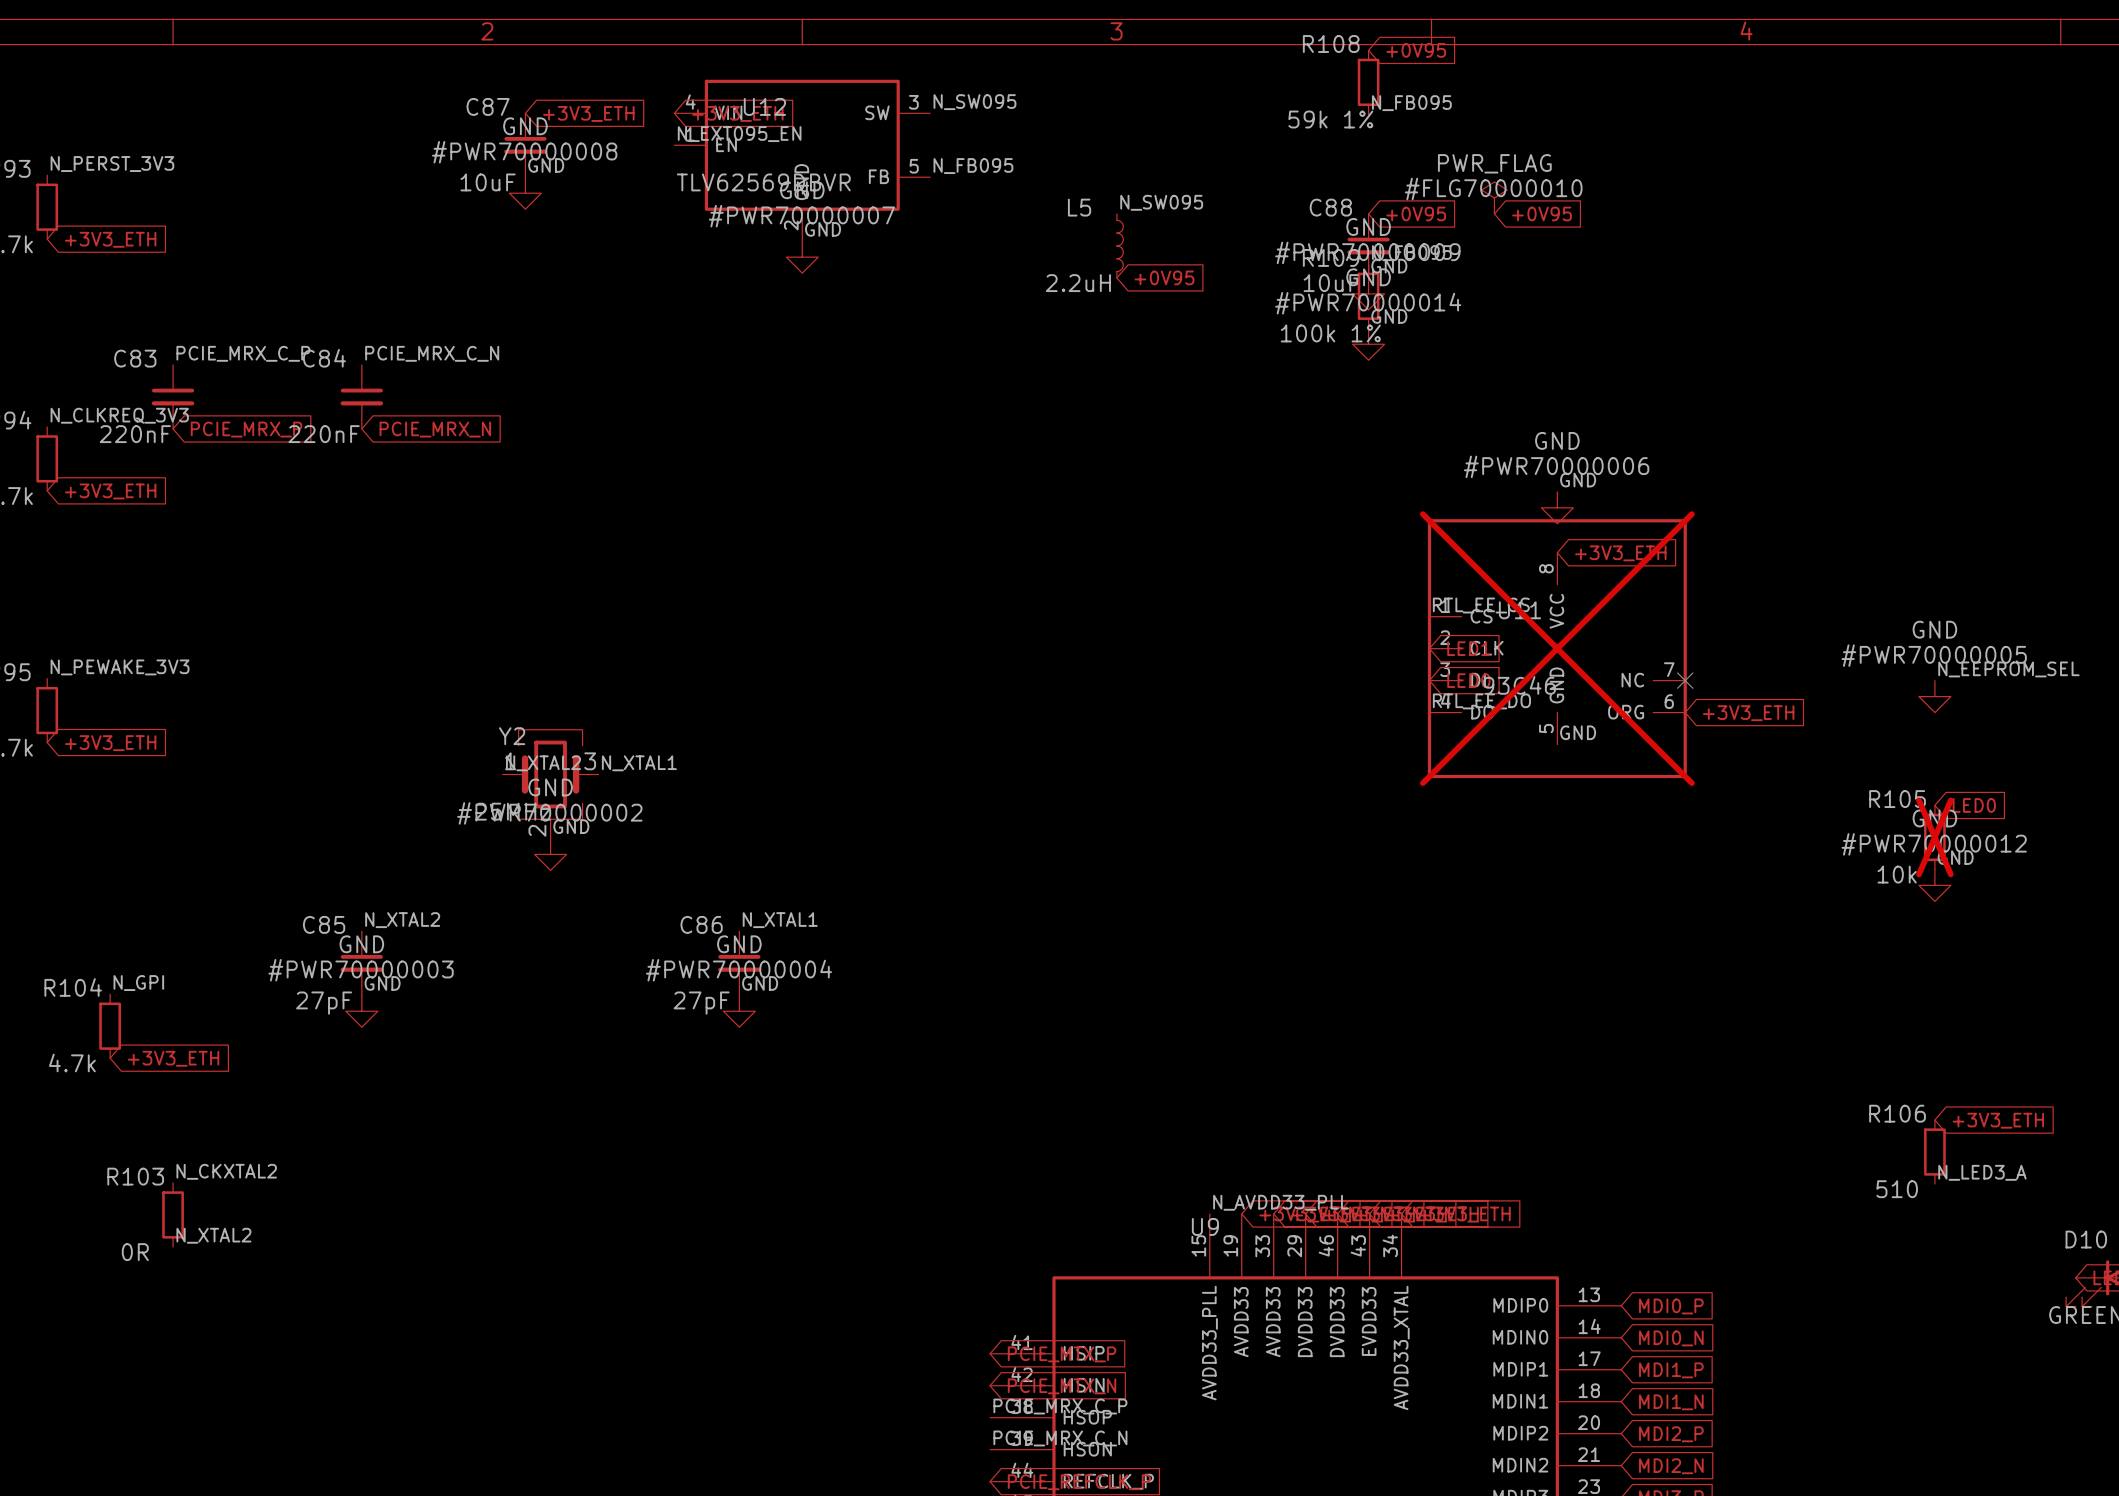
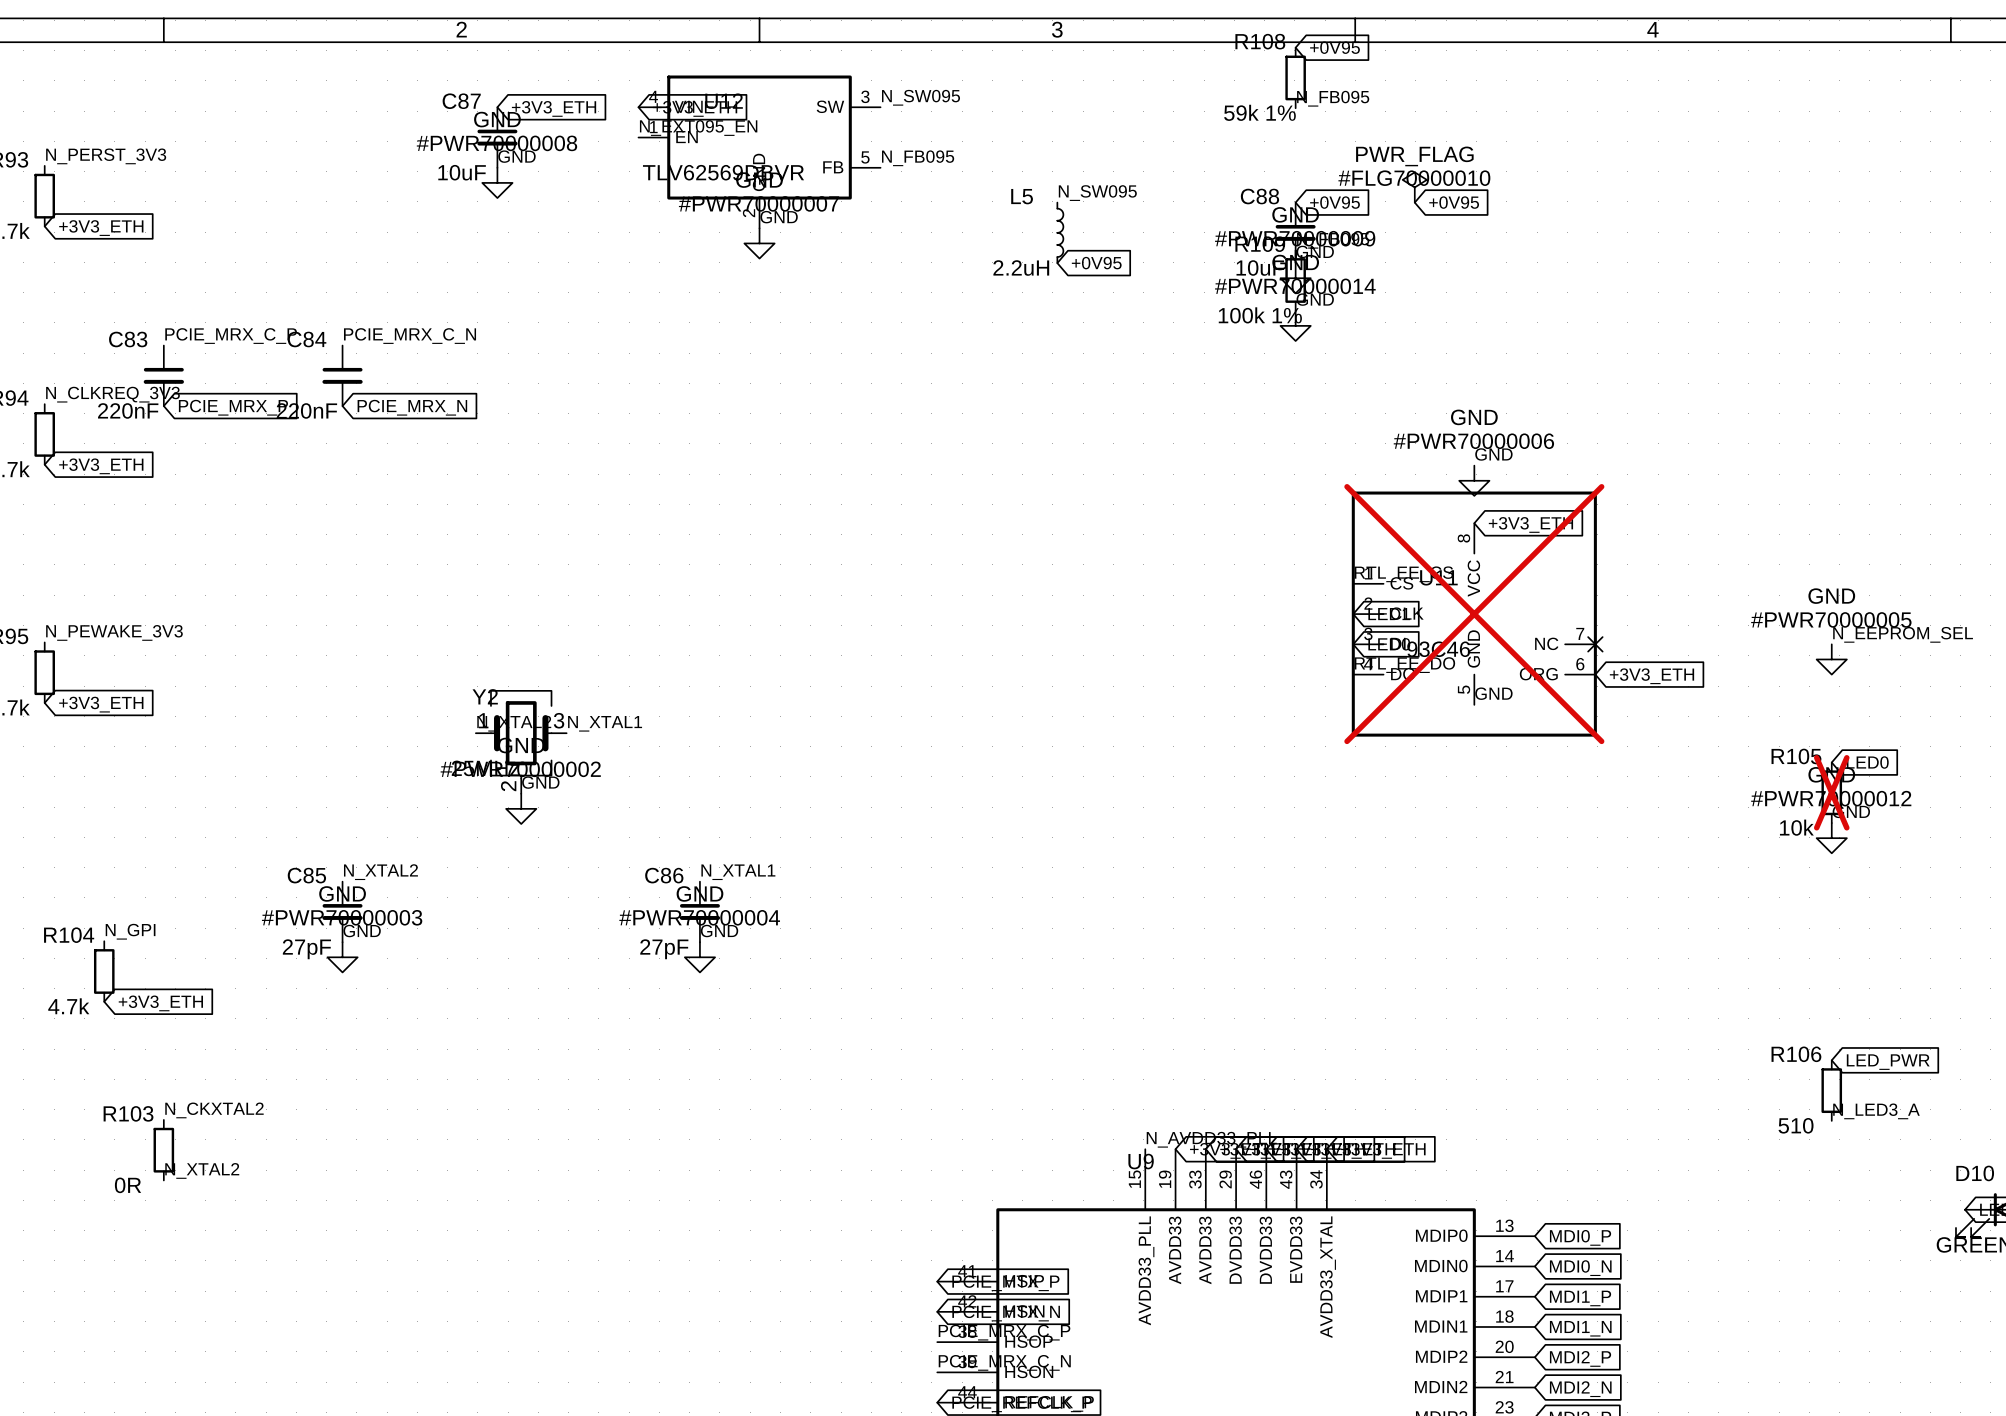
global label: +3V3_ETH (1998, 1120) -> LED_PWR (1888, 1062)

